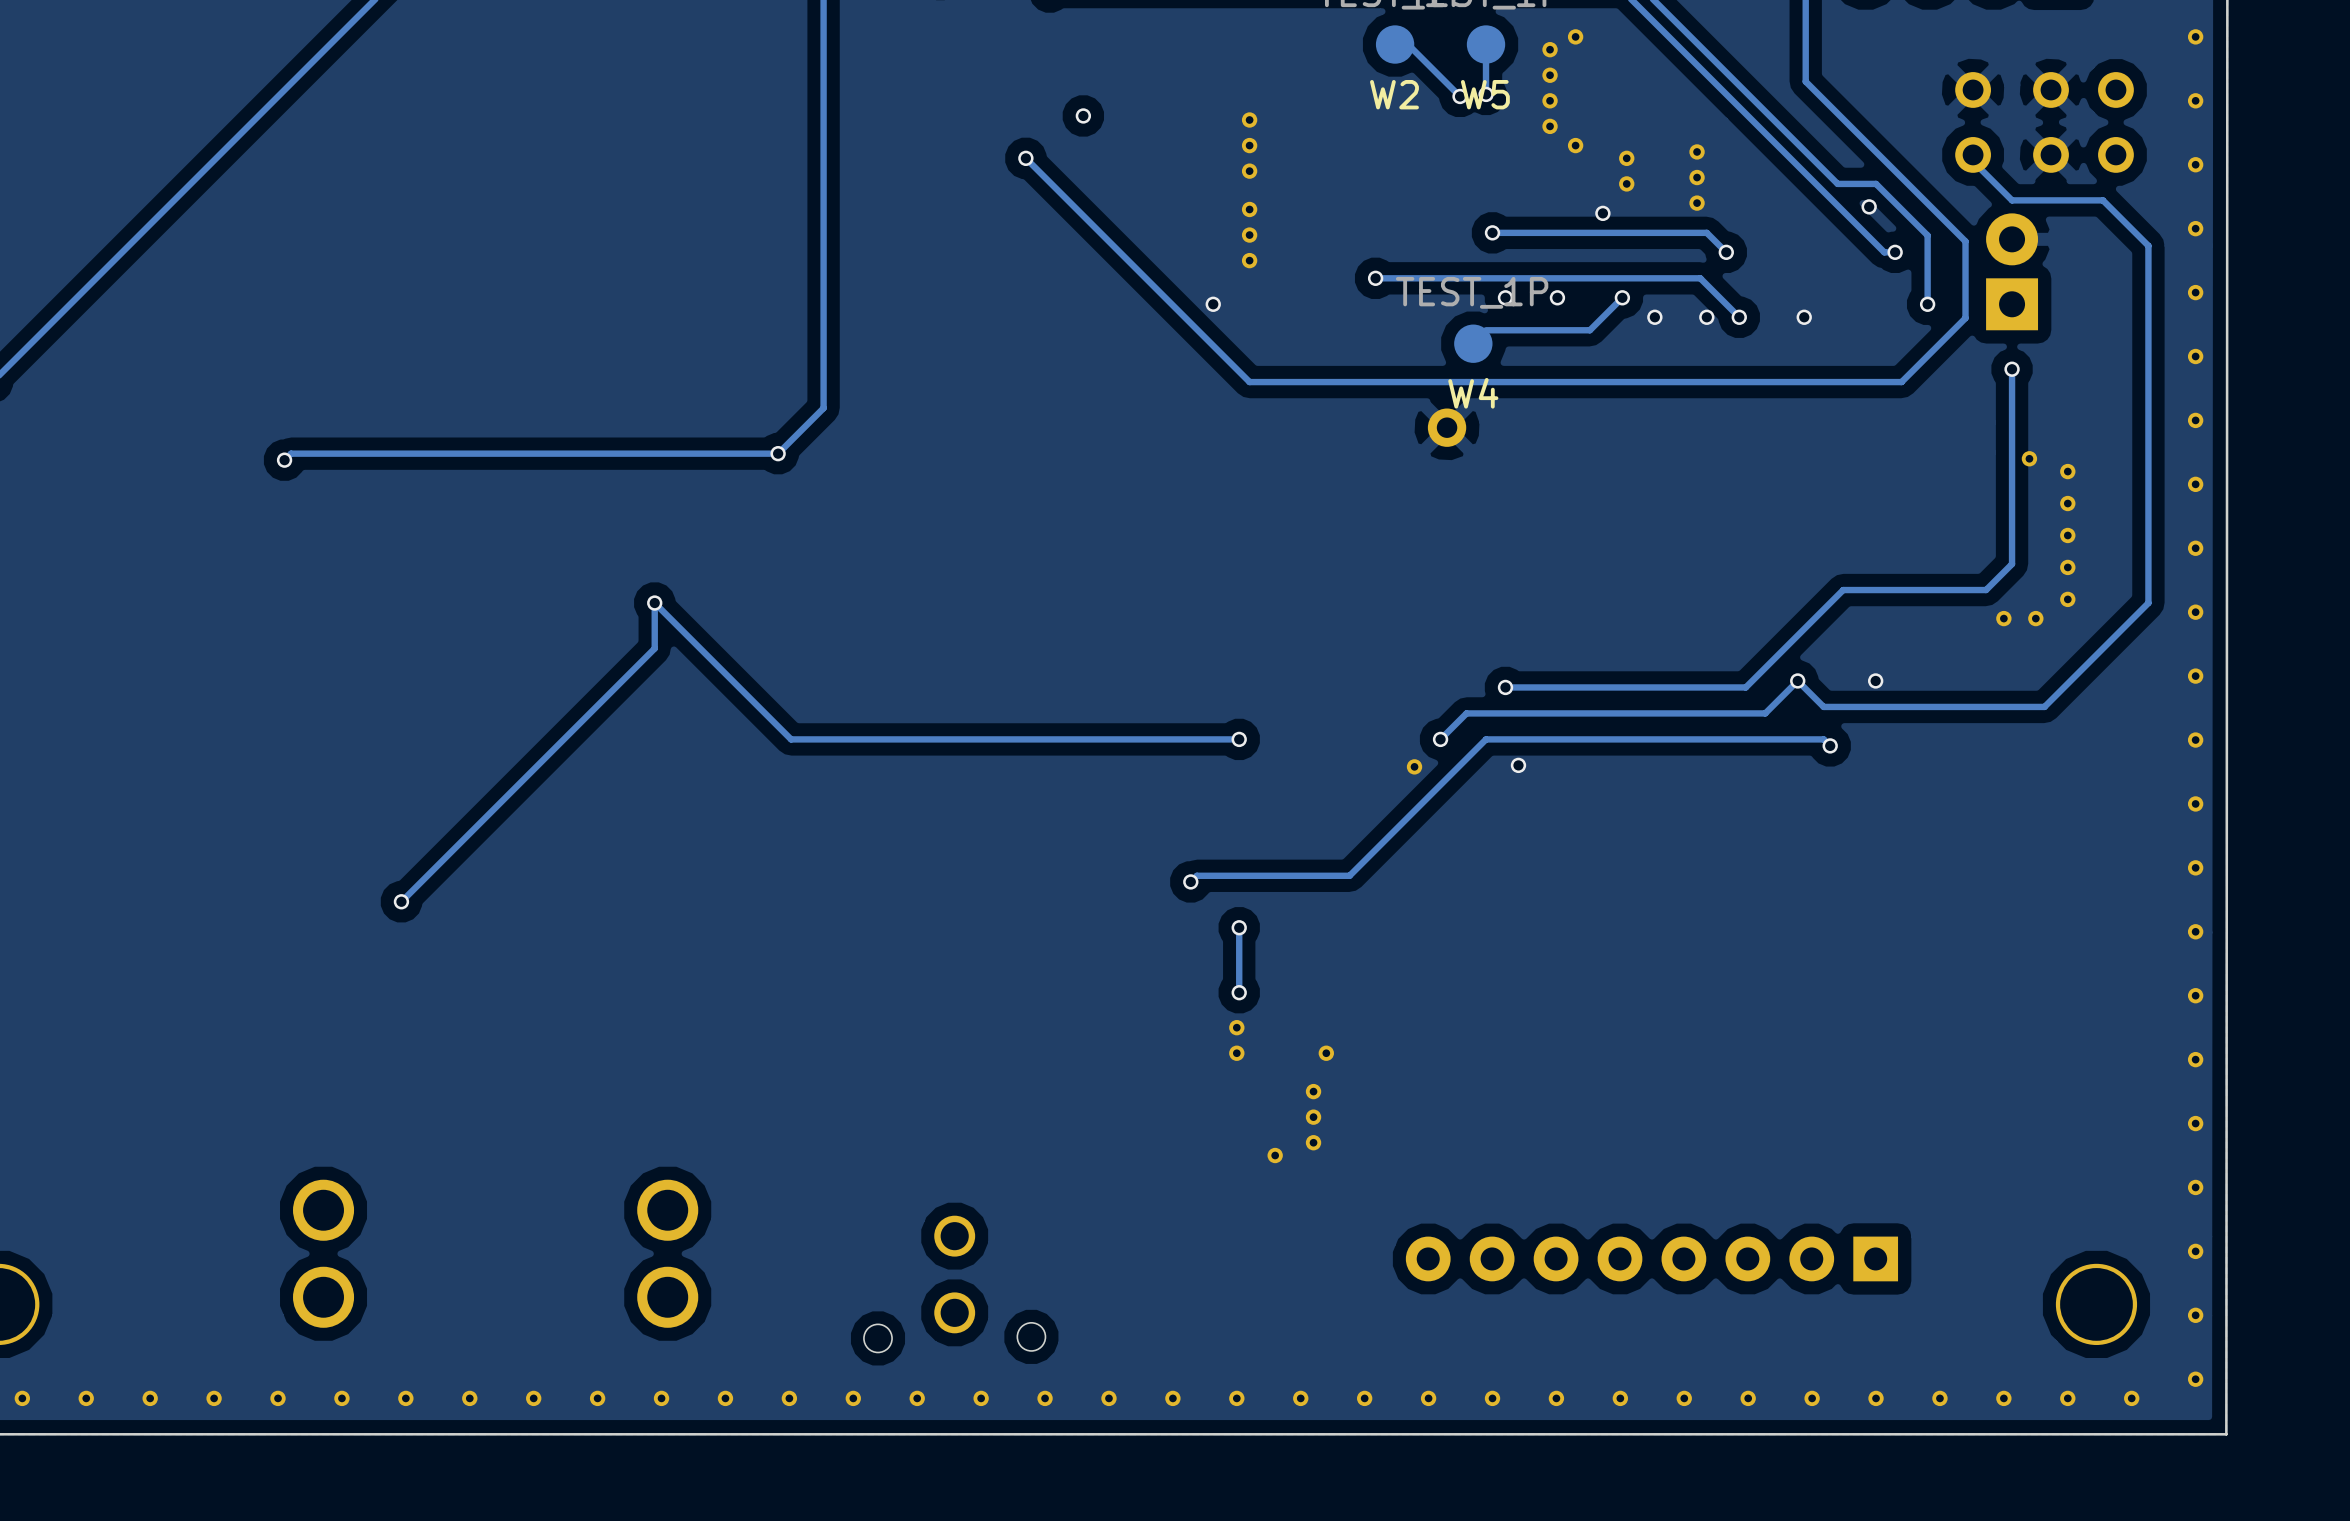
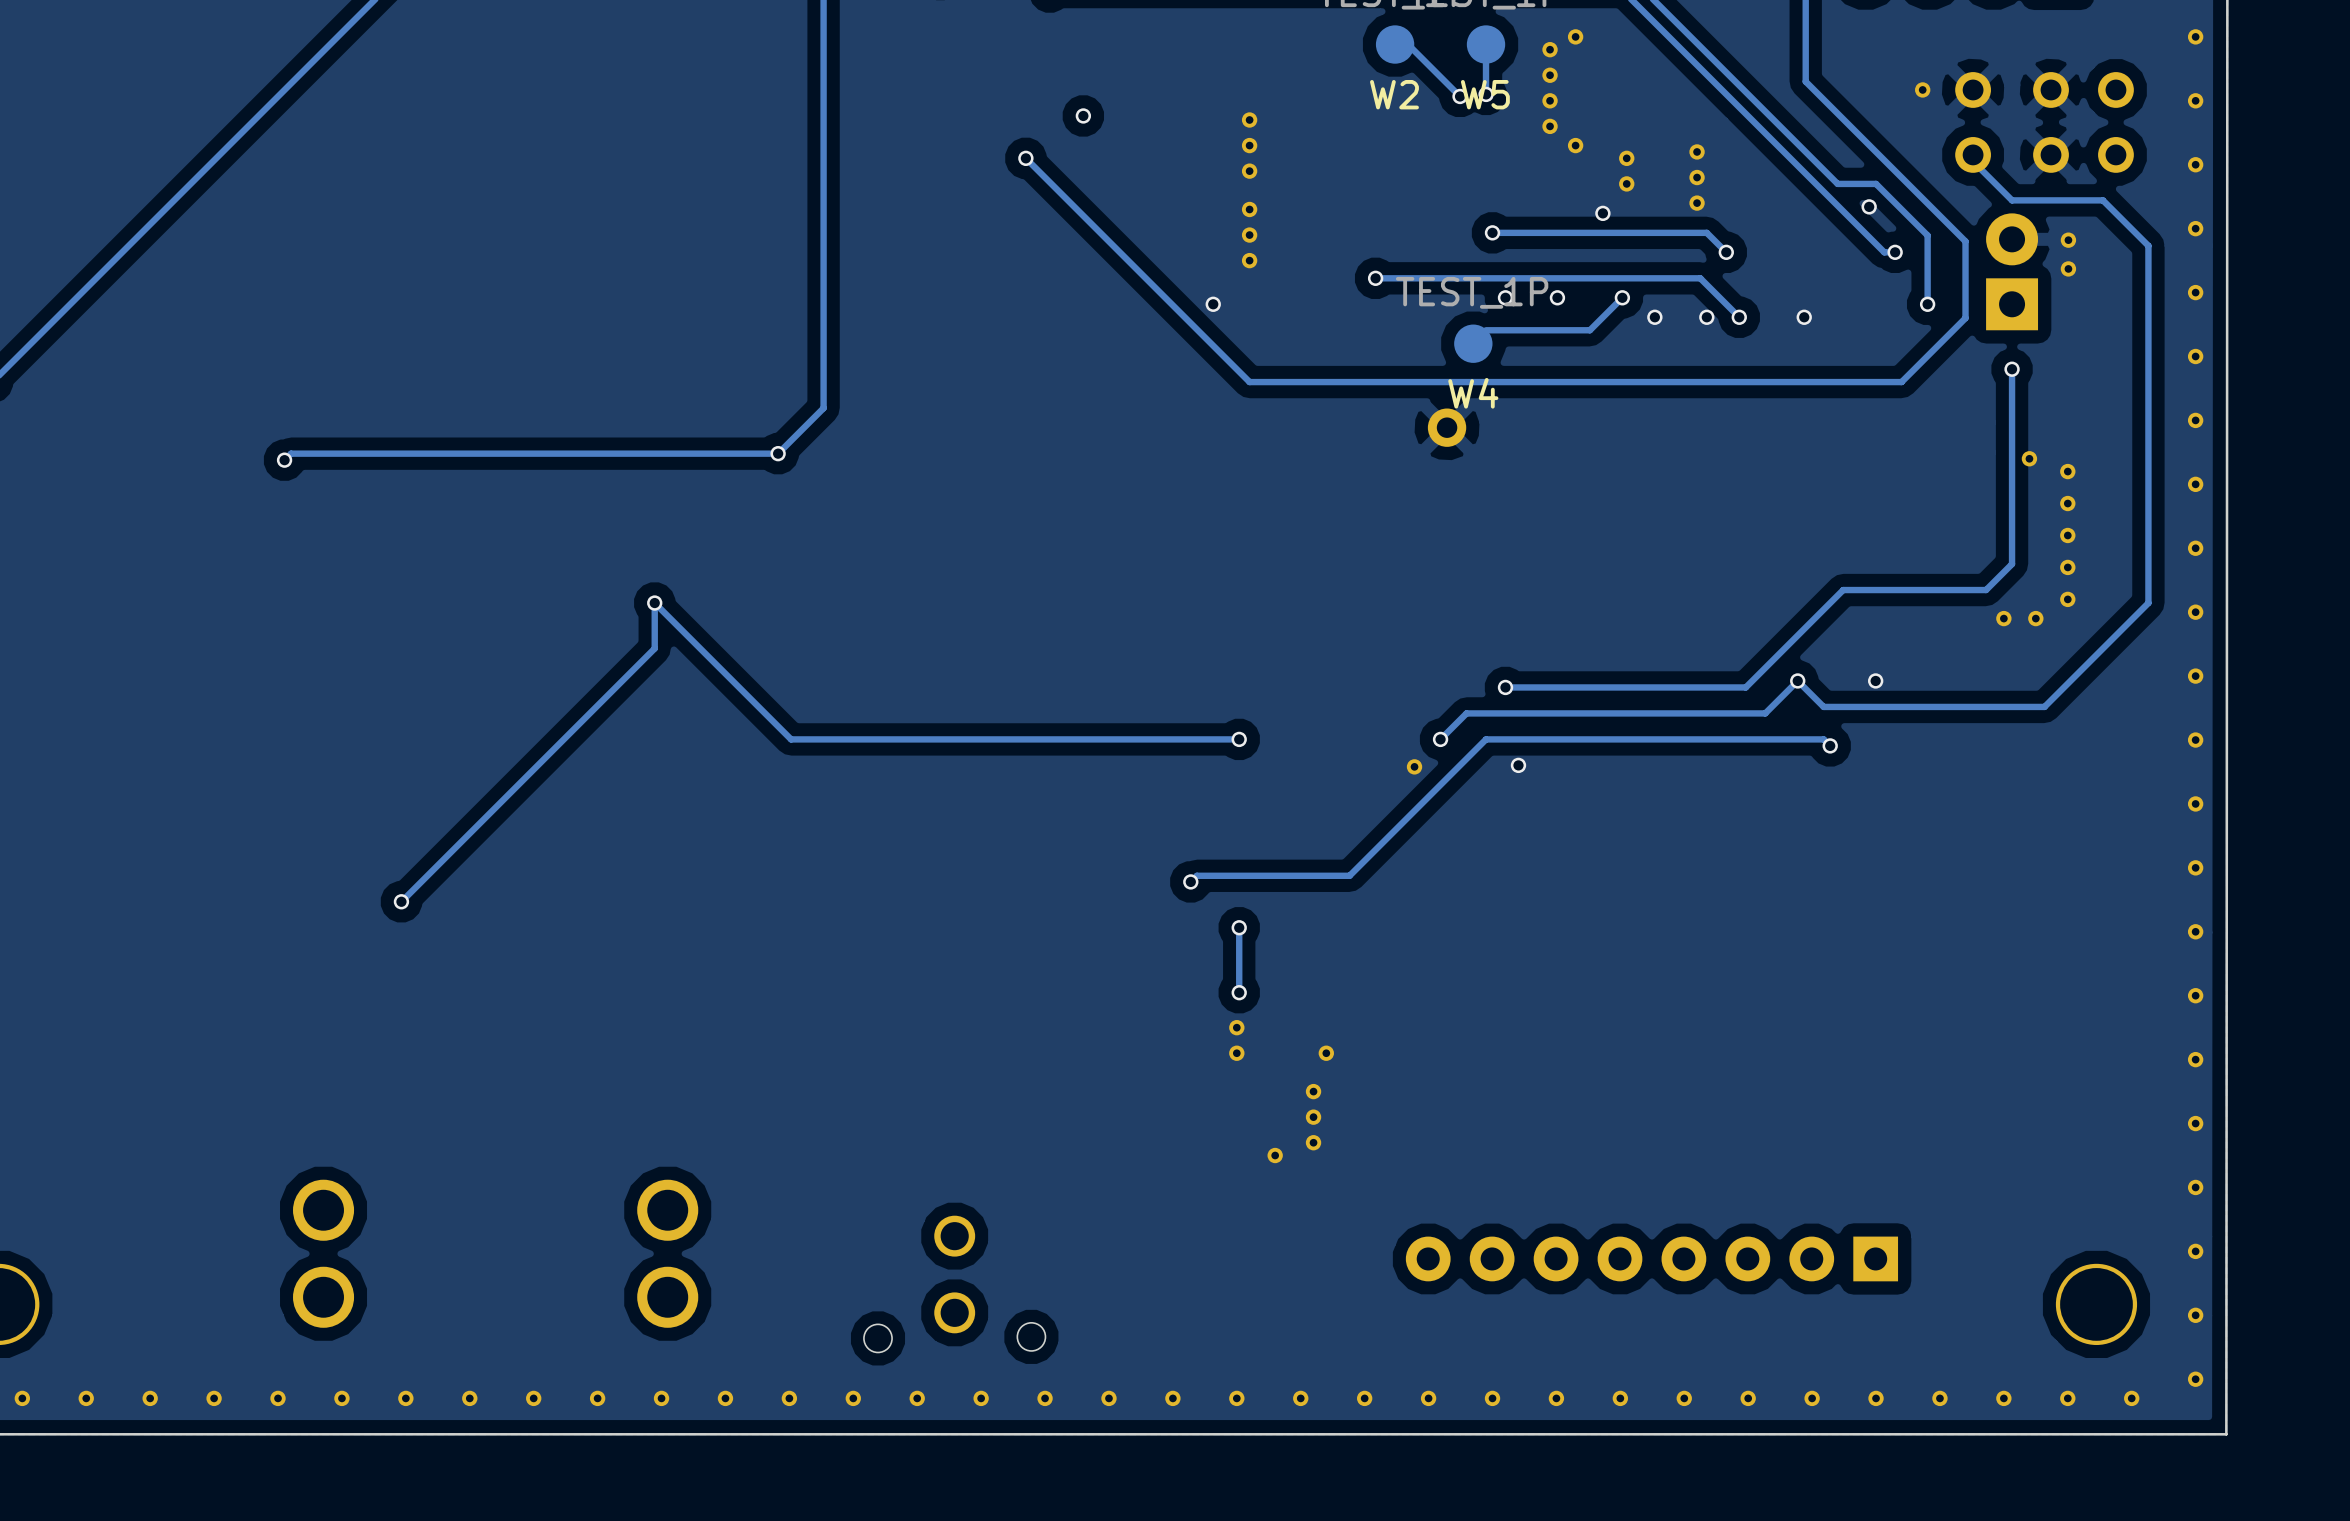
part: none -> (1922, 89)
part: none -> (2068, 240)
part: none -> (2068, 268)

